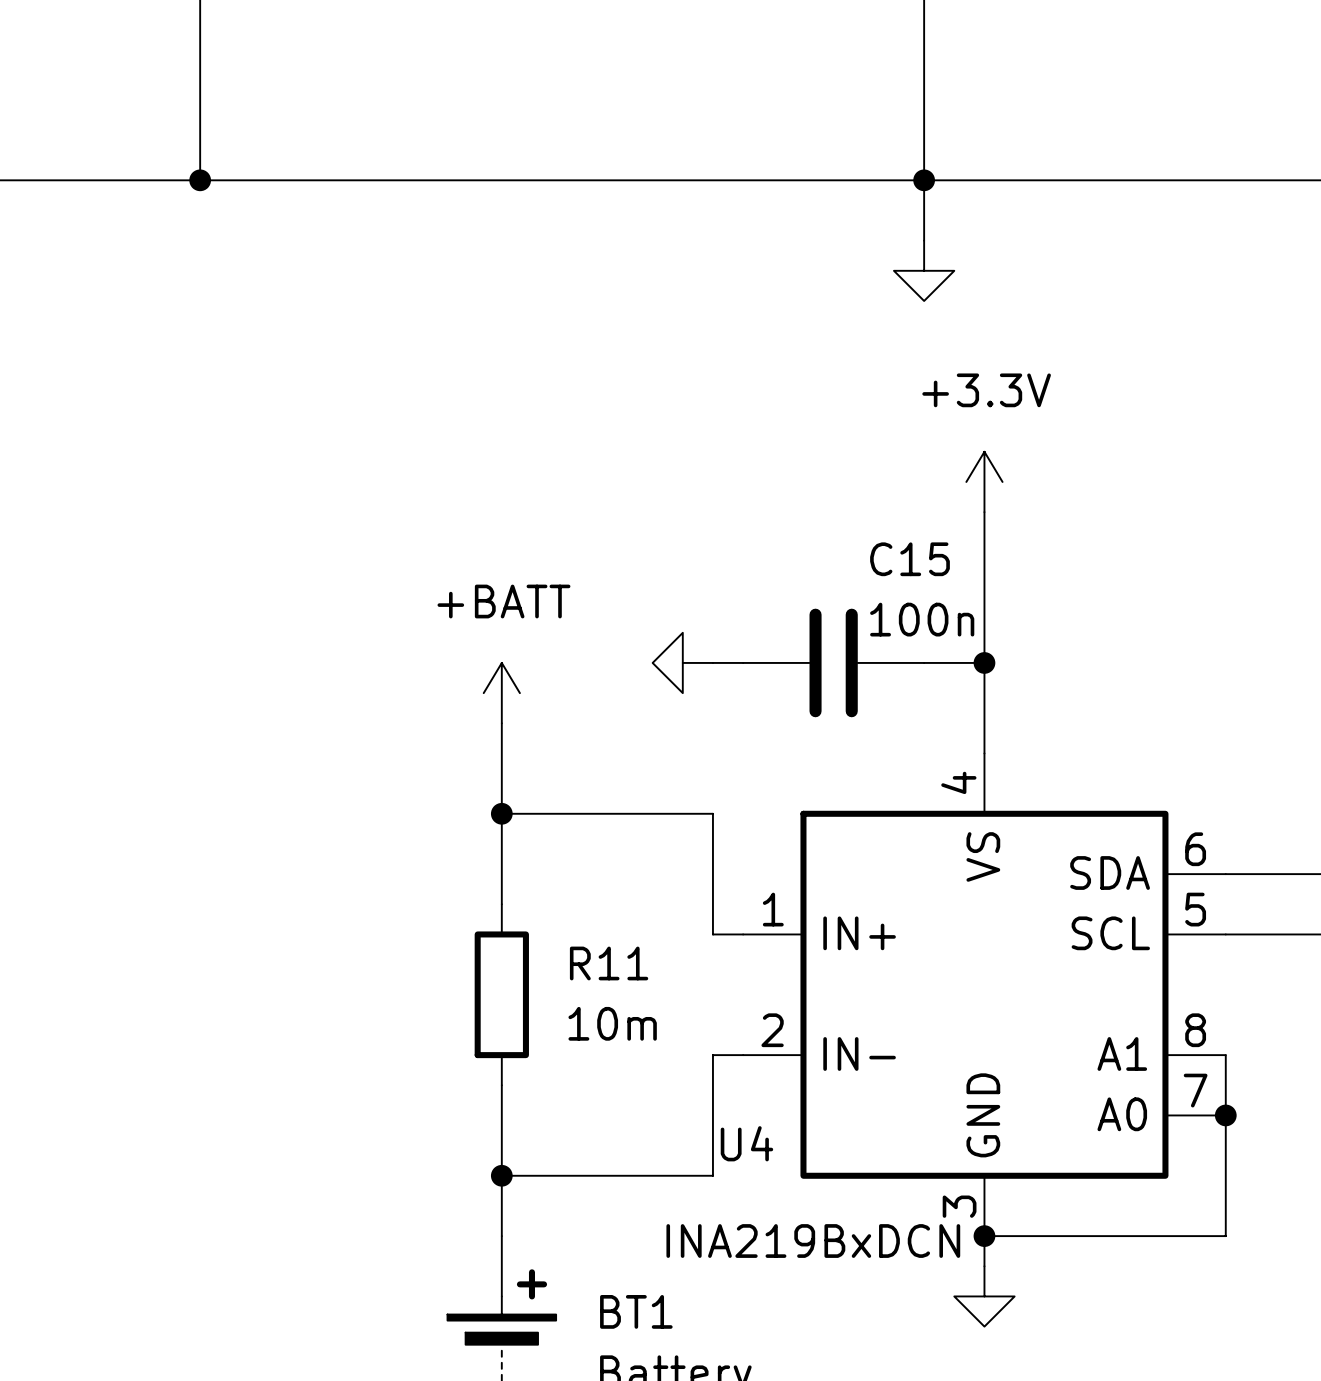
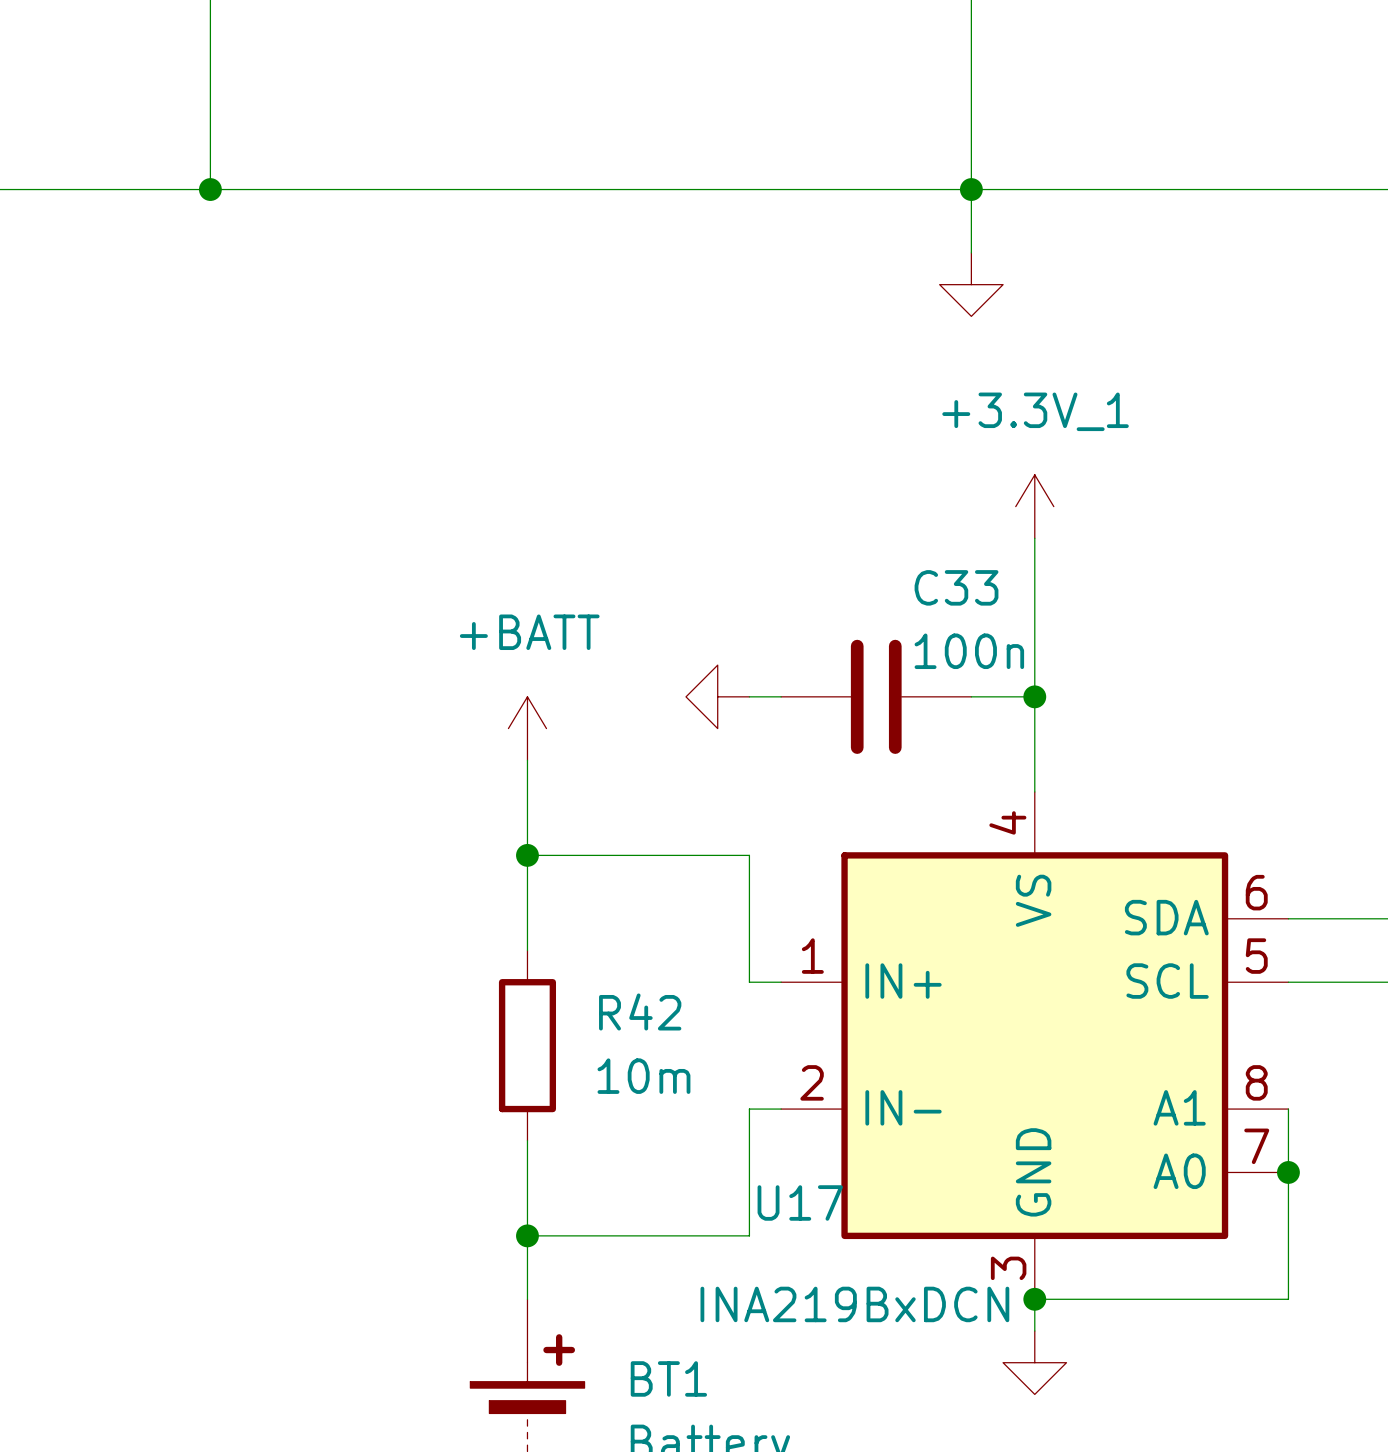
power symbol: +3.3V (984, 481) -> +3.3V_1 (1034, 506)
C15 name: C15 (909, 559) -> C33 (956, 587)
R11 name: R11 (609, 963) -> R42 (640, 1011)
U4 name: U4 (746, 1143) -> U17 (800, 1202)

